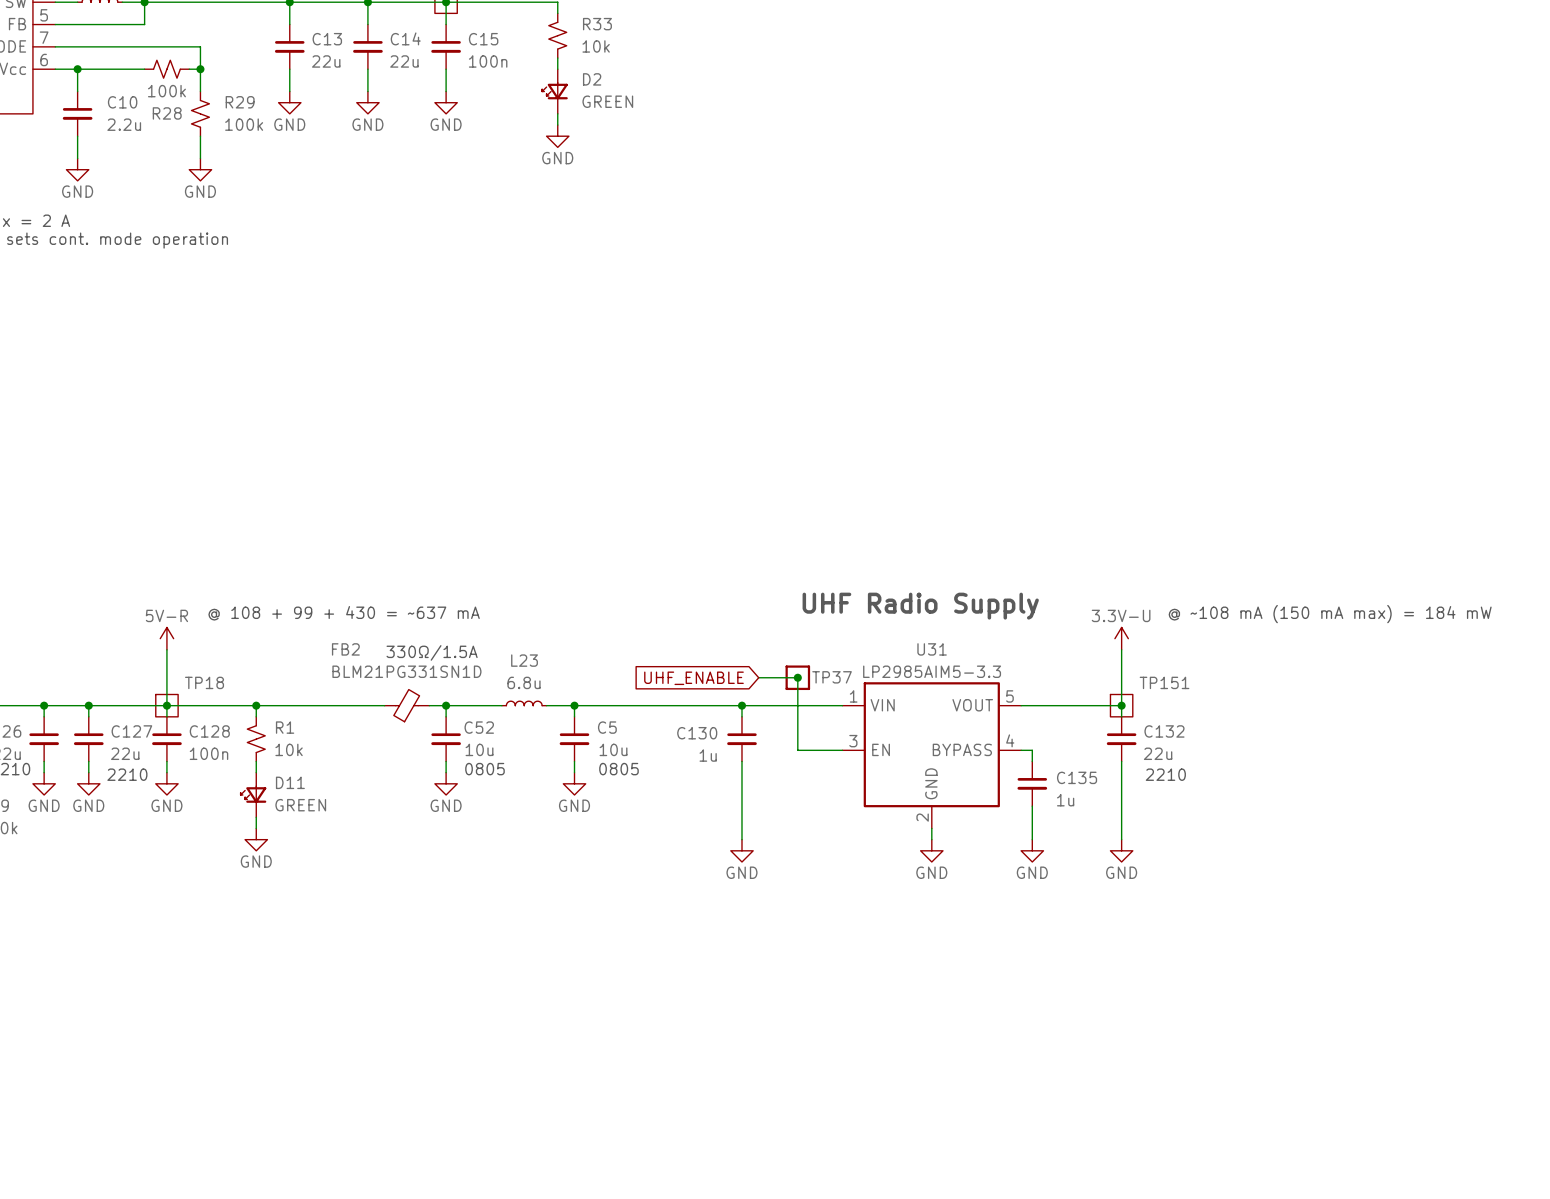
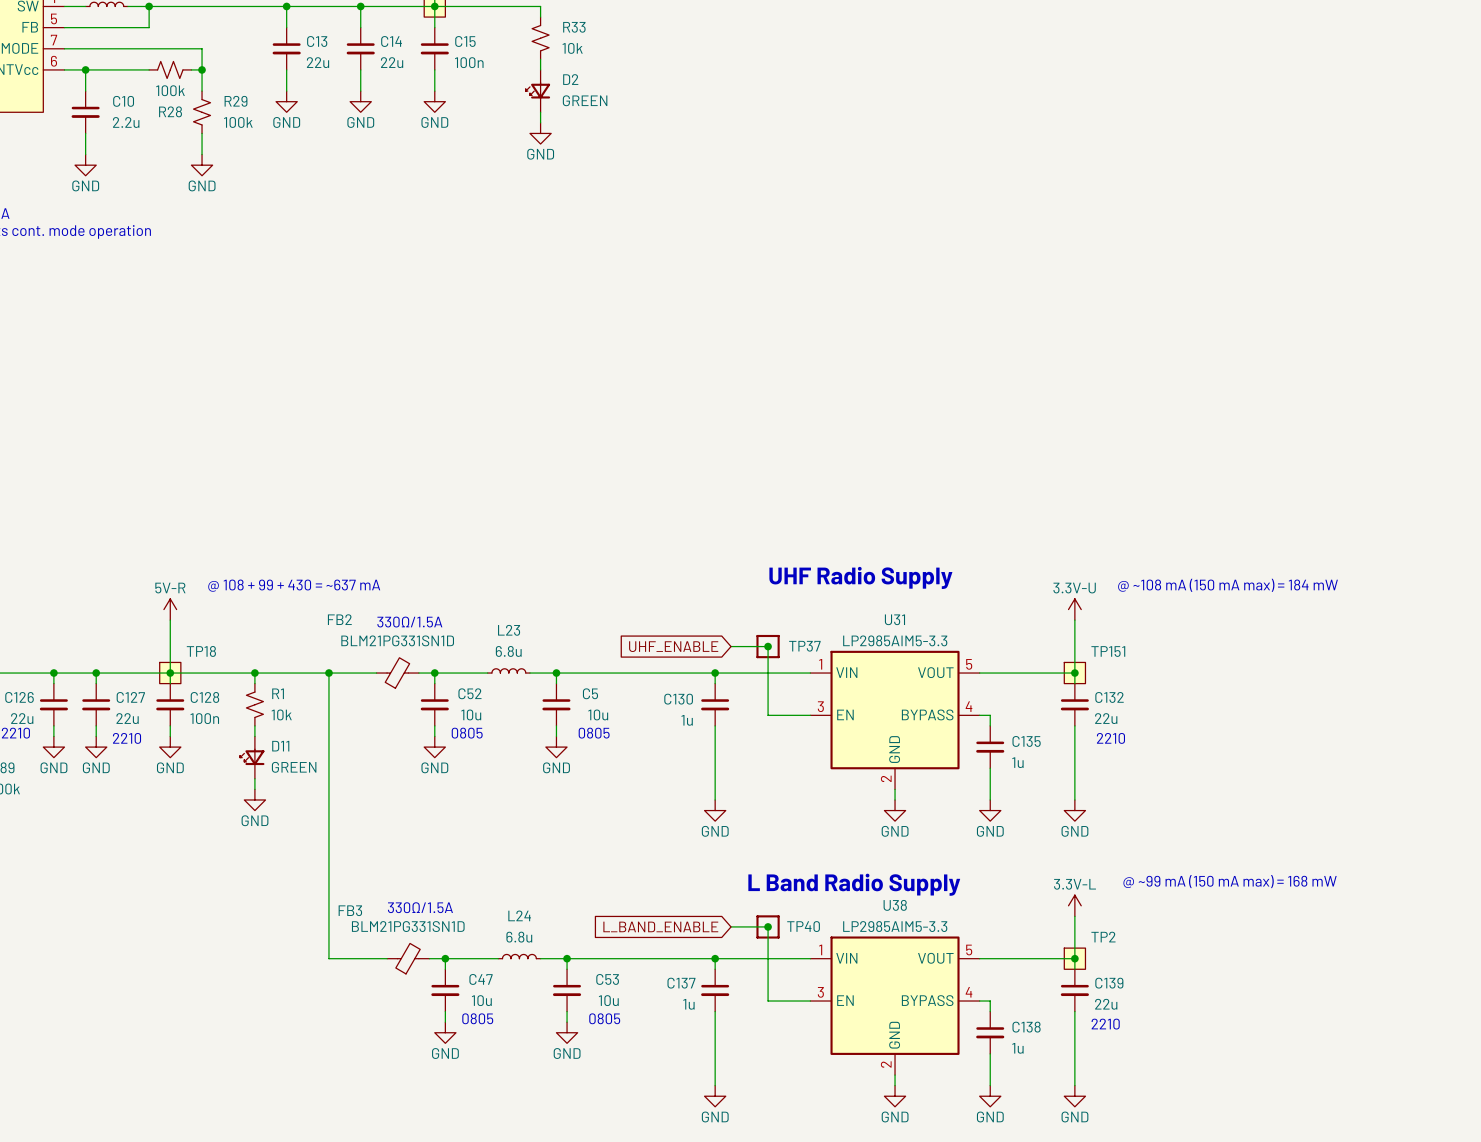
wire: none -> (328, 673) (328, 958) (387, 958)
junction: none -> (328, 673)
text: none -> @ ~99 mA (150 mA max) = 168 mW (1230, 881)
text: none -> L Band Radio Supply (854, 884)
power symbol: none -> 3.3V-L (1074, 905)
text: none -> 330Ω/1.5A (420, 907)
wire: none -> (1074, 916) (1074, 969)
wire: none -> (731, 926) (768, 926) (768, 1001) (810, 1001)
junction: none -> (768, 926)
TP40: none -> (768, 926)
global label: none -> L_BAND_ENABLE (660, 926)
L24: none -> 6.8u (519, 956)
FB3: none -> BLM21PG331SN1D (408, 958)
wire: none -> (429, 958) (498, 958)
wire: none -> (445, 958) (445, 969)
junction: none -> (445, 958)
wire: none -> (540, 958) (810, 958)
wire: none -> (567, 958) (567, 969)
junction: none -> (567, 958)
wire: none -> (715, 958) (715, 969)
junction: none -> (715, 958)
wire: none -> (979, 958) (1074, 958)
junction: none -> (1074, 958)
TP2: none -> (1074, 958)
C47: none -> 10u (445, 990)
C53: none -> 10u (567, 990)
C137: none -> 1u (715, 990)
C139: none -> 22u (1074, 990)
wire: none -> (979, 1001) (990, 1001) (990, 1011)
U38: none -> LP2985AIM5-3.3 (895, 1005)
wire: none -> (445, 1011) (445, 1022)
wire: none -> (567, 1011) (567, 1022)
wire: none -> (715, 1011) (715, 1085)
wire: none -> (1074, 1011) (1074, 1085)
text: none -> 0805 (477, 1018)
text: none -> 0805 (604, 1018)
text: none -> 2210 (1105, 1024)
power symbol: none -> GND (445, 1032)
power symbol: none -> GND (567, 1032)
C138: none -> 1u (990, 1032)
wire: none -> (990, 1053) (990, 1085)
wire: none -> (895, 1075) (895, 1085)
power symbol: none -> GND (715, 1096)
power symbol: none -> GND (895, 1096)
power symbol: none -> GND (990, 1096)
power symbol: none -> GND (1074, 1096)

